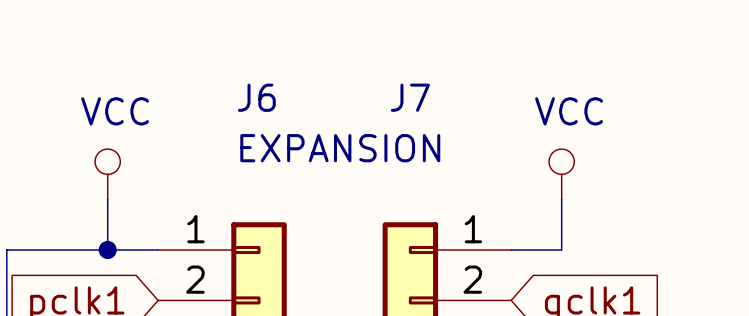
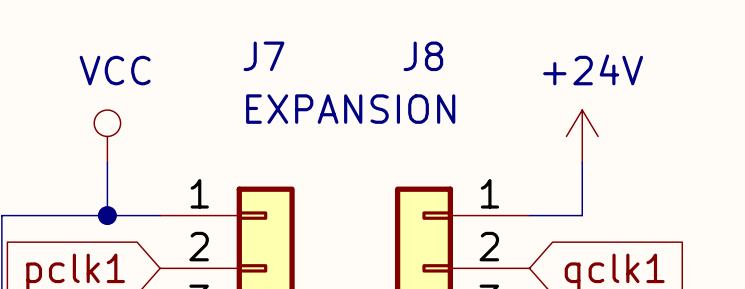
J6 name: J6 (256, 97) -> J7 (264, 56)
J7 name: J7 (410, 97) -> J8 (423, 56)
power symbol: VCC (561, 174) -> +24V (582, 136)

